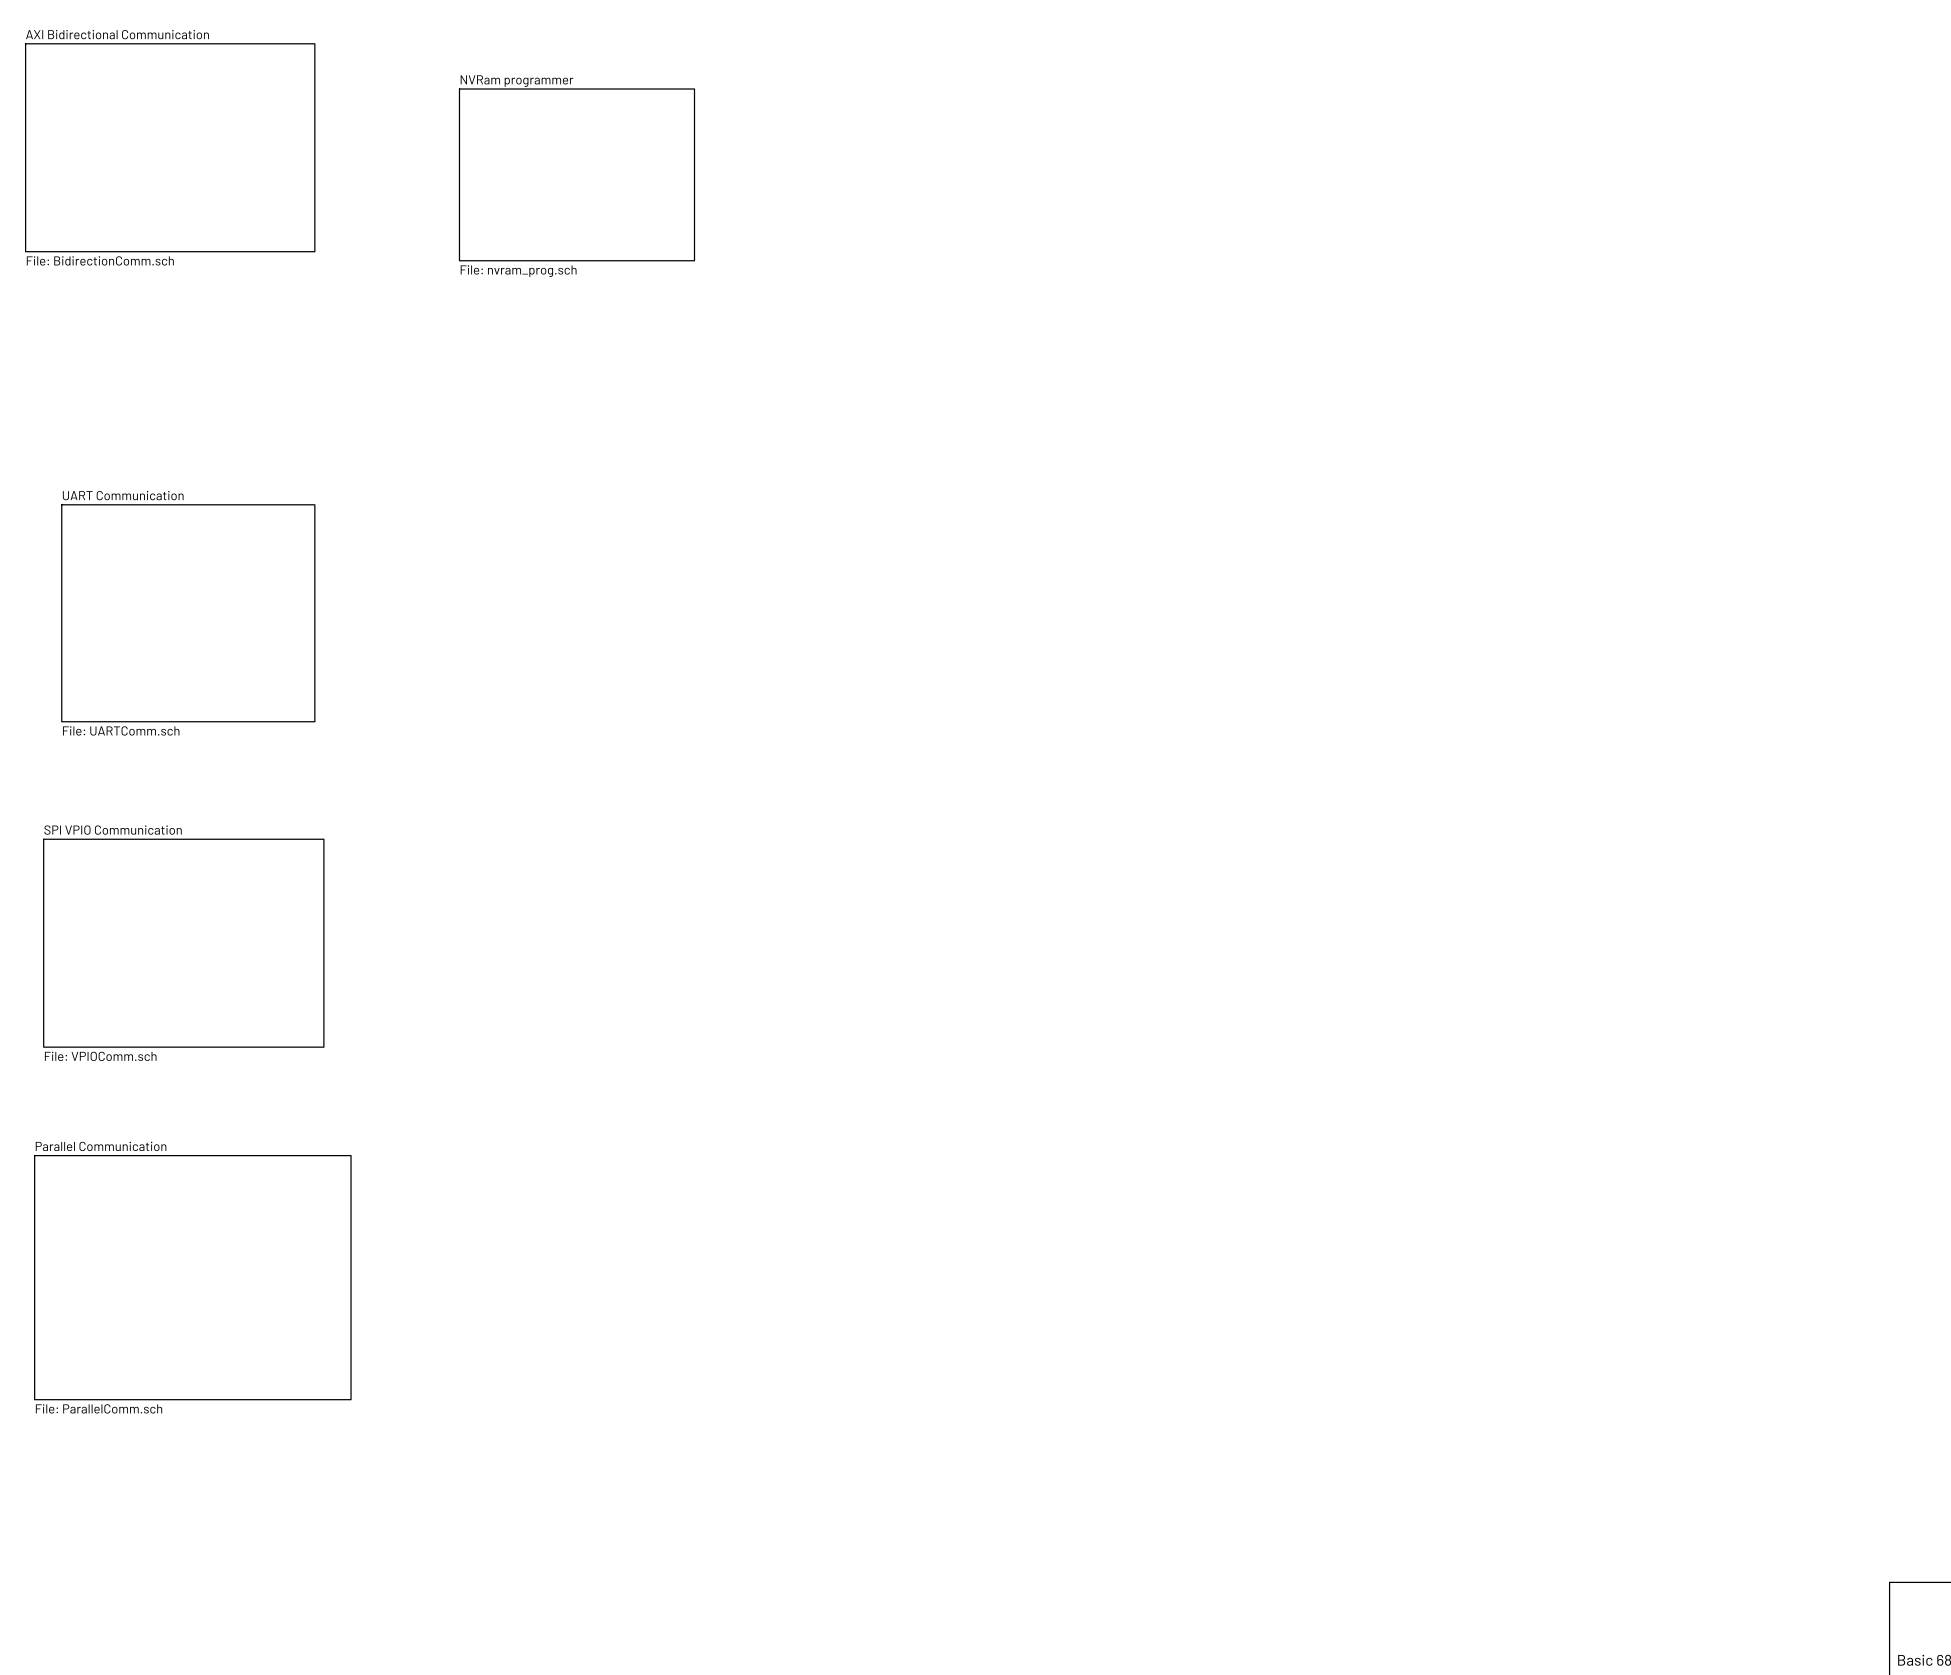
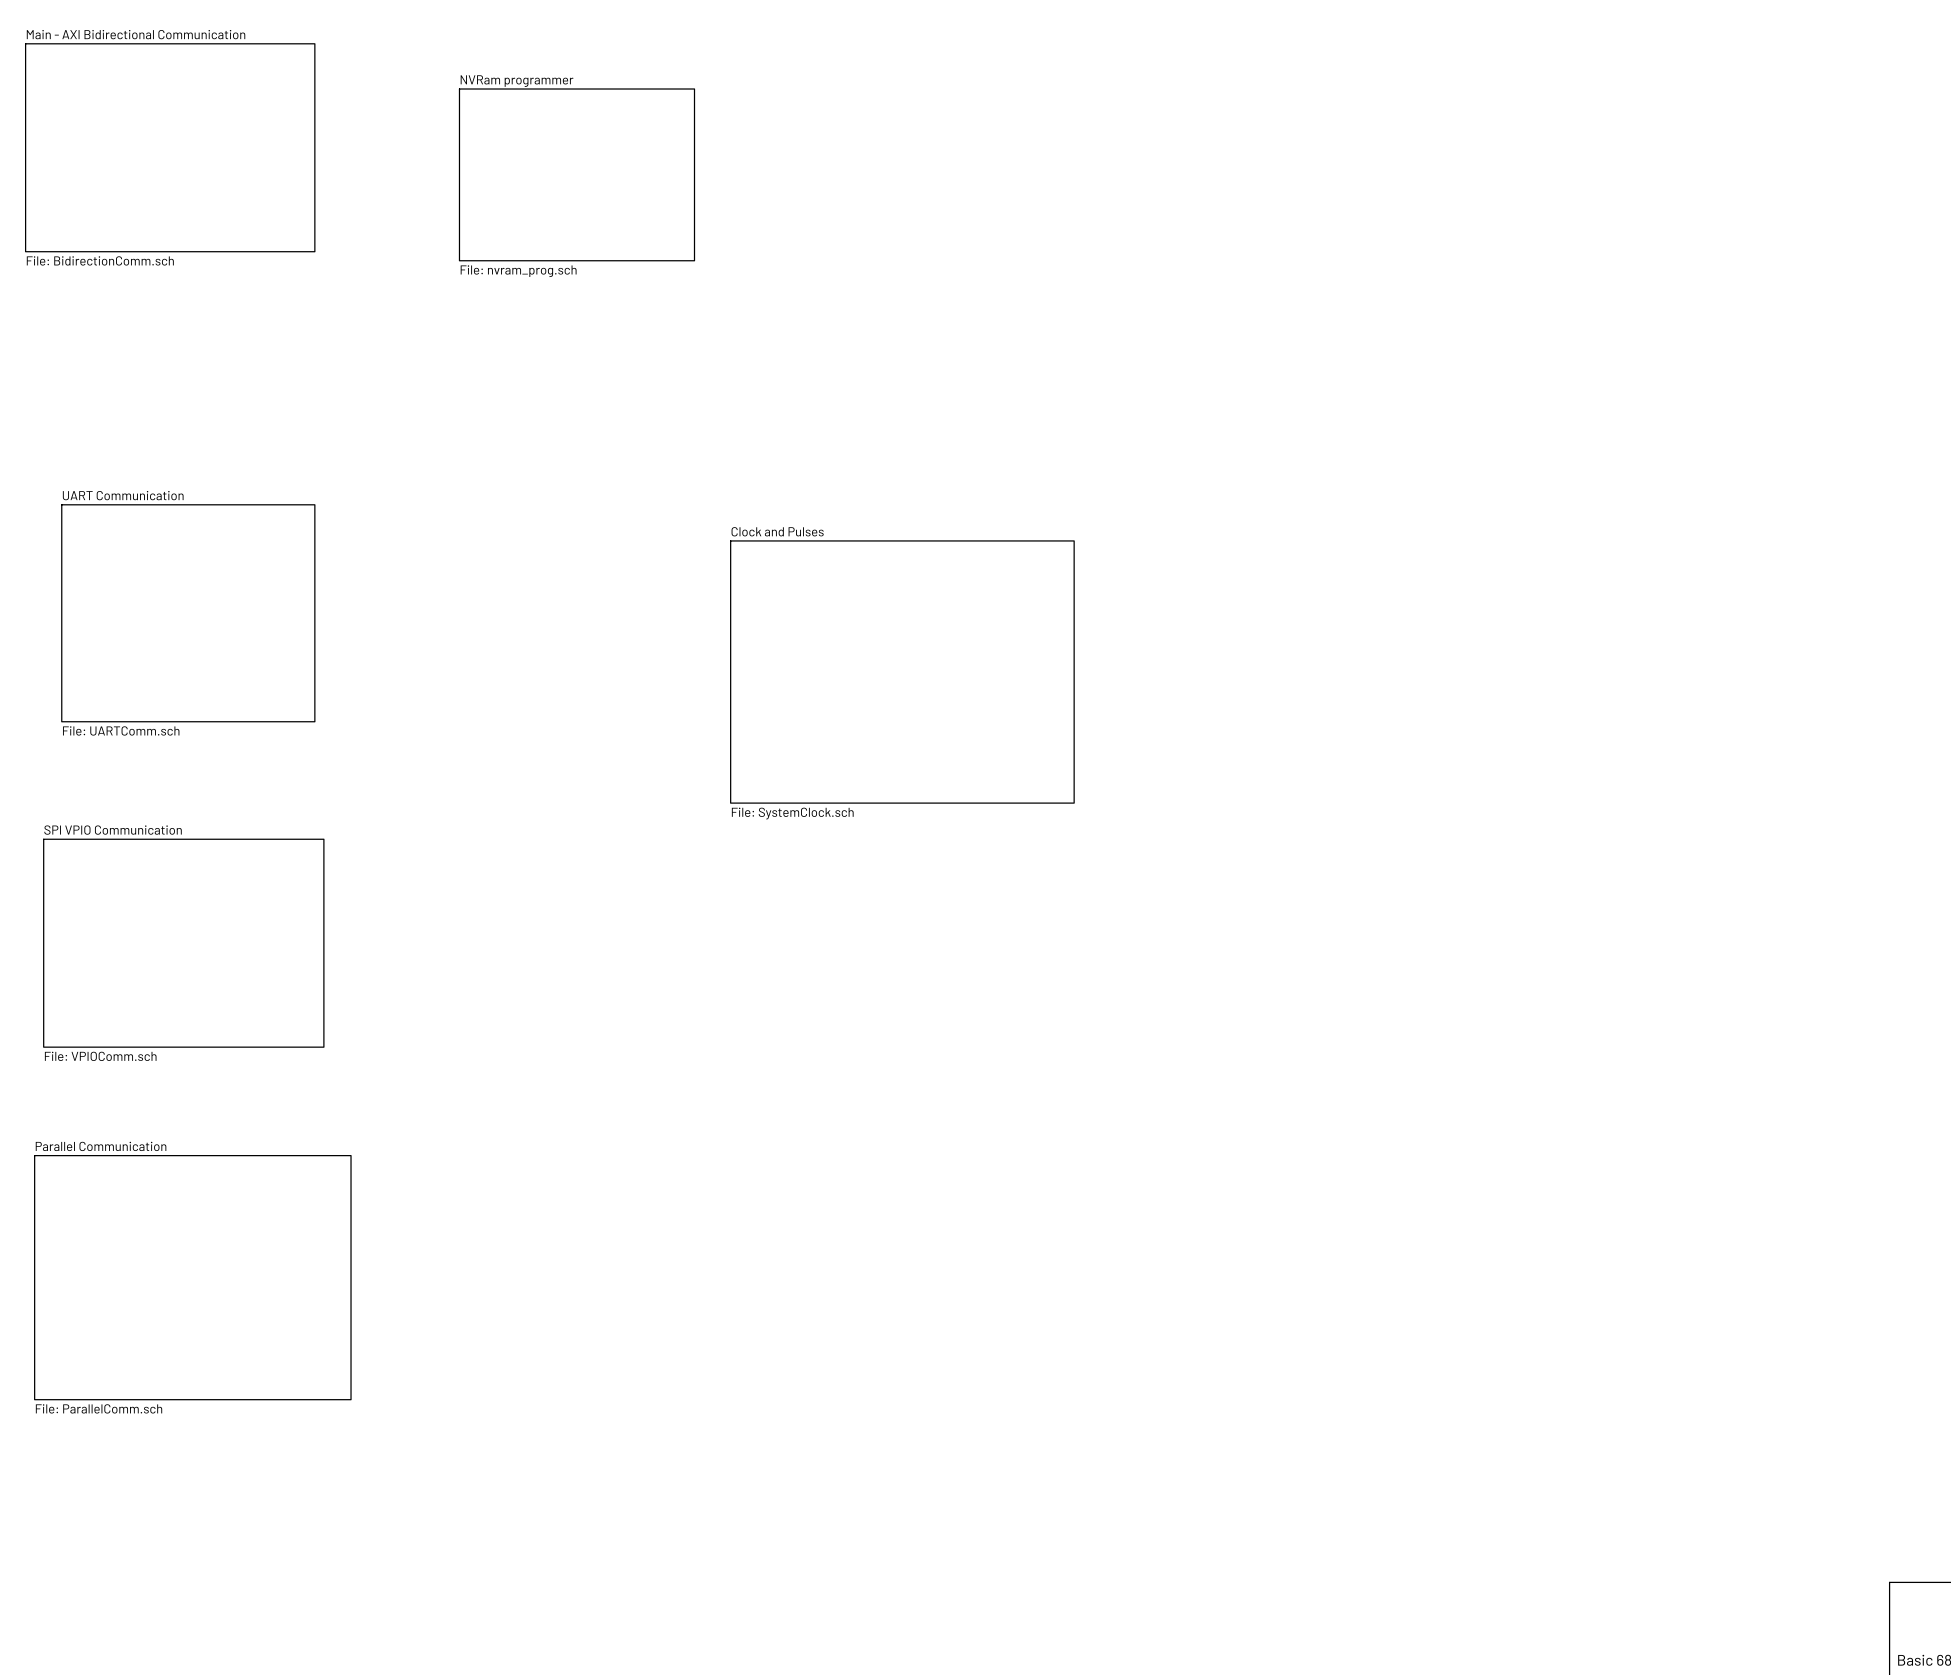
sheet AXI Bidirectional Communication name: AXI Bidirectional Communication (117, 34) -> Main - AXI Bidirectional Communication (136, 34)
sheet Clock and Pulses: none -> File: SystemClock.sch (902, 672)

